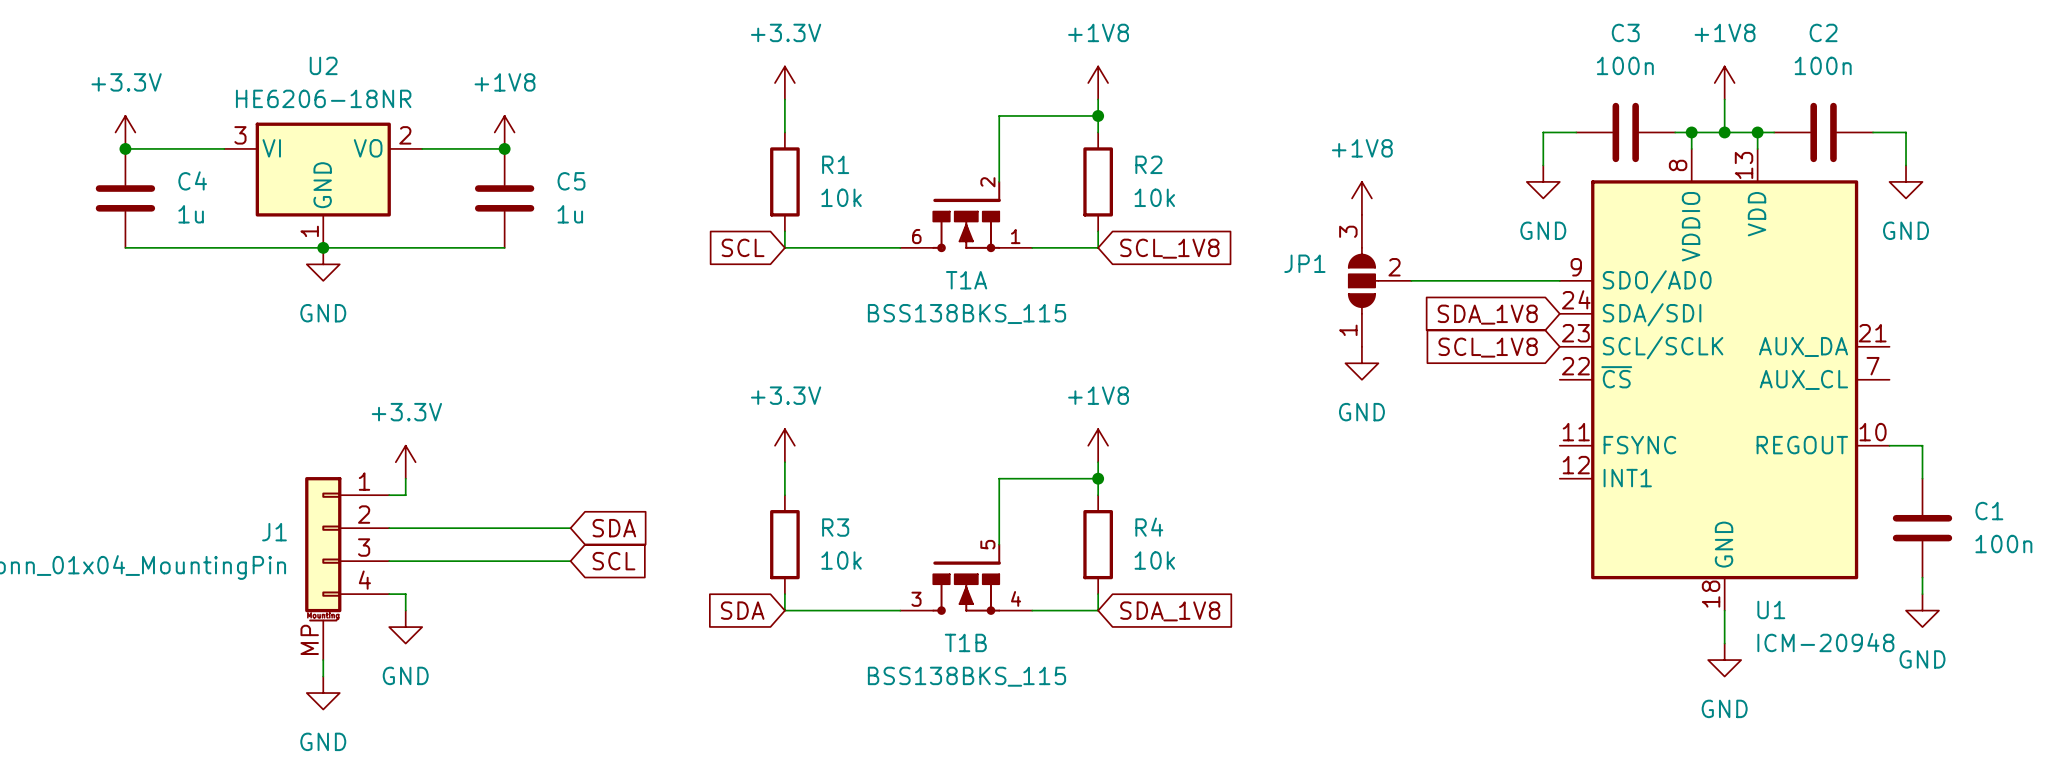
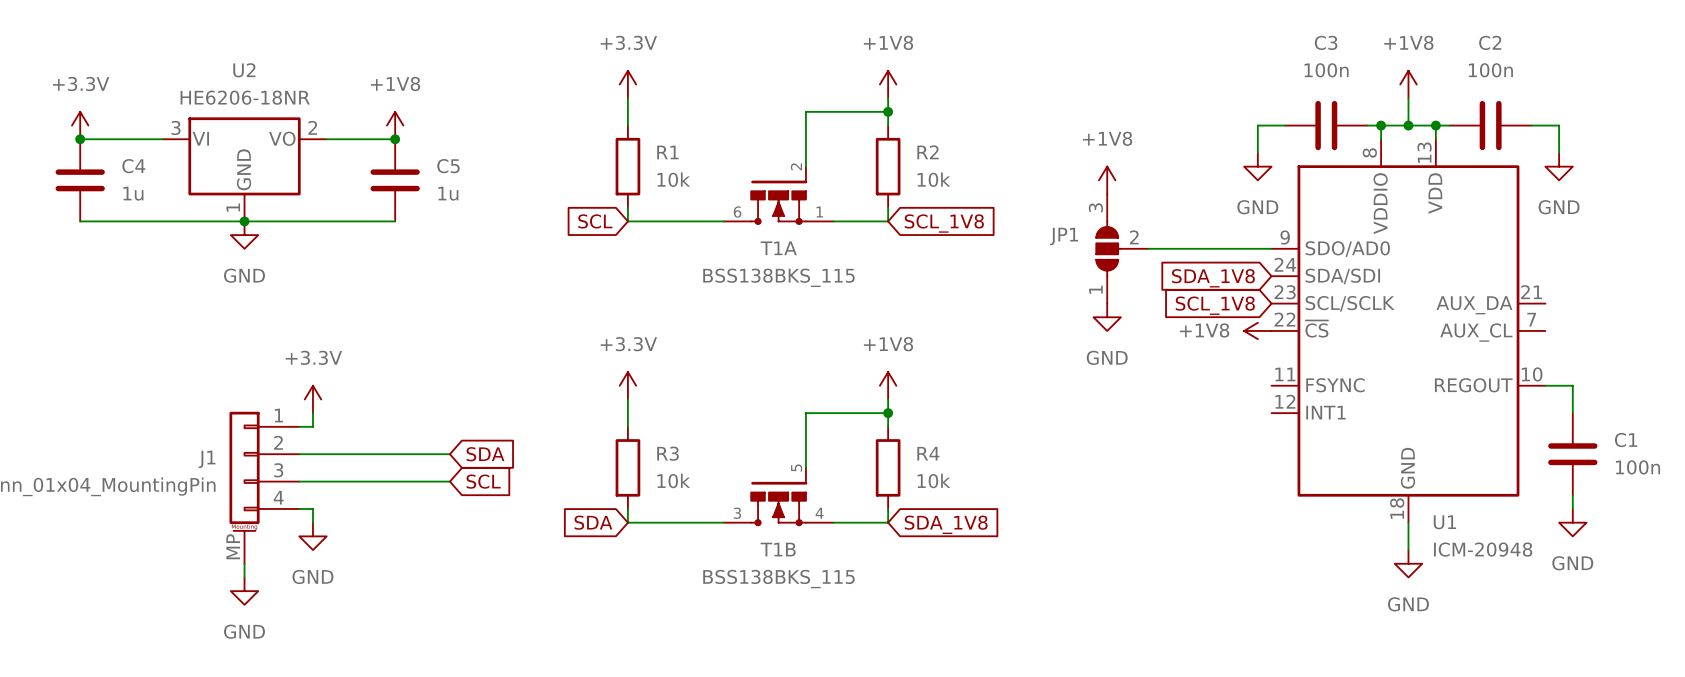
power symbol: none -> +1V8 (1257, 330)

